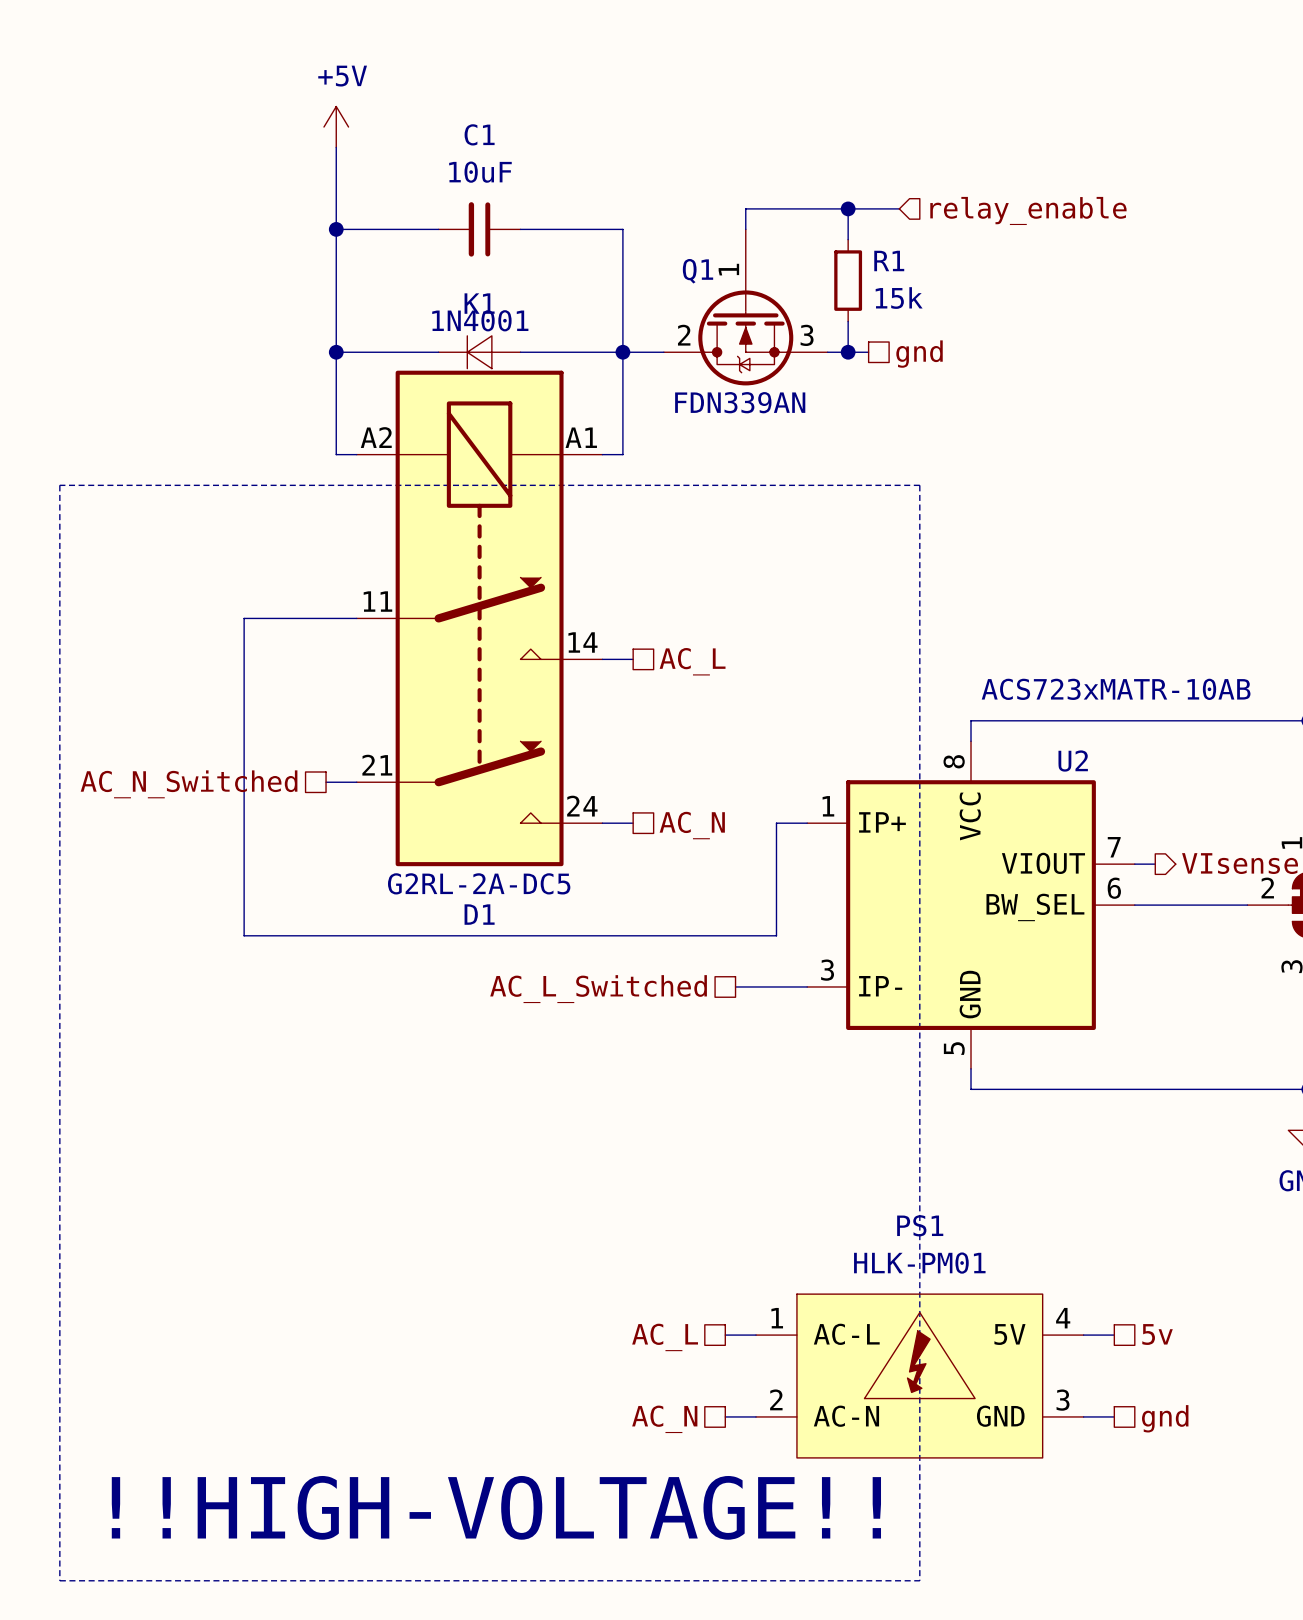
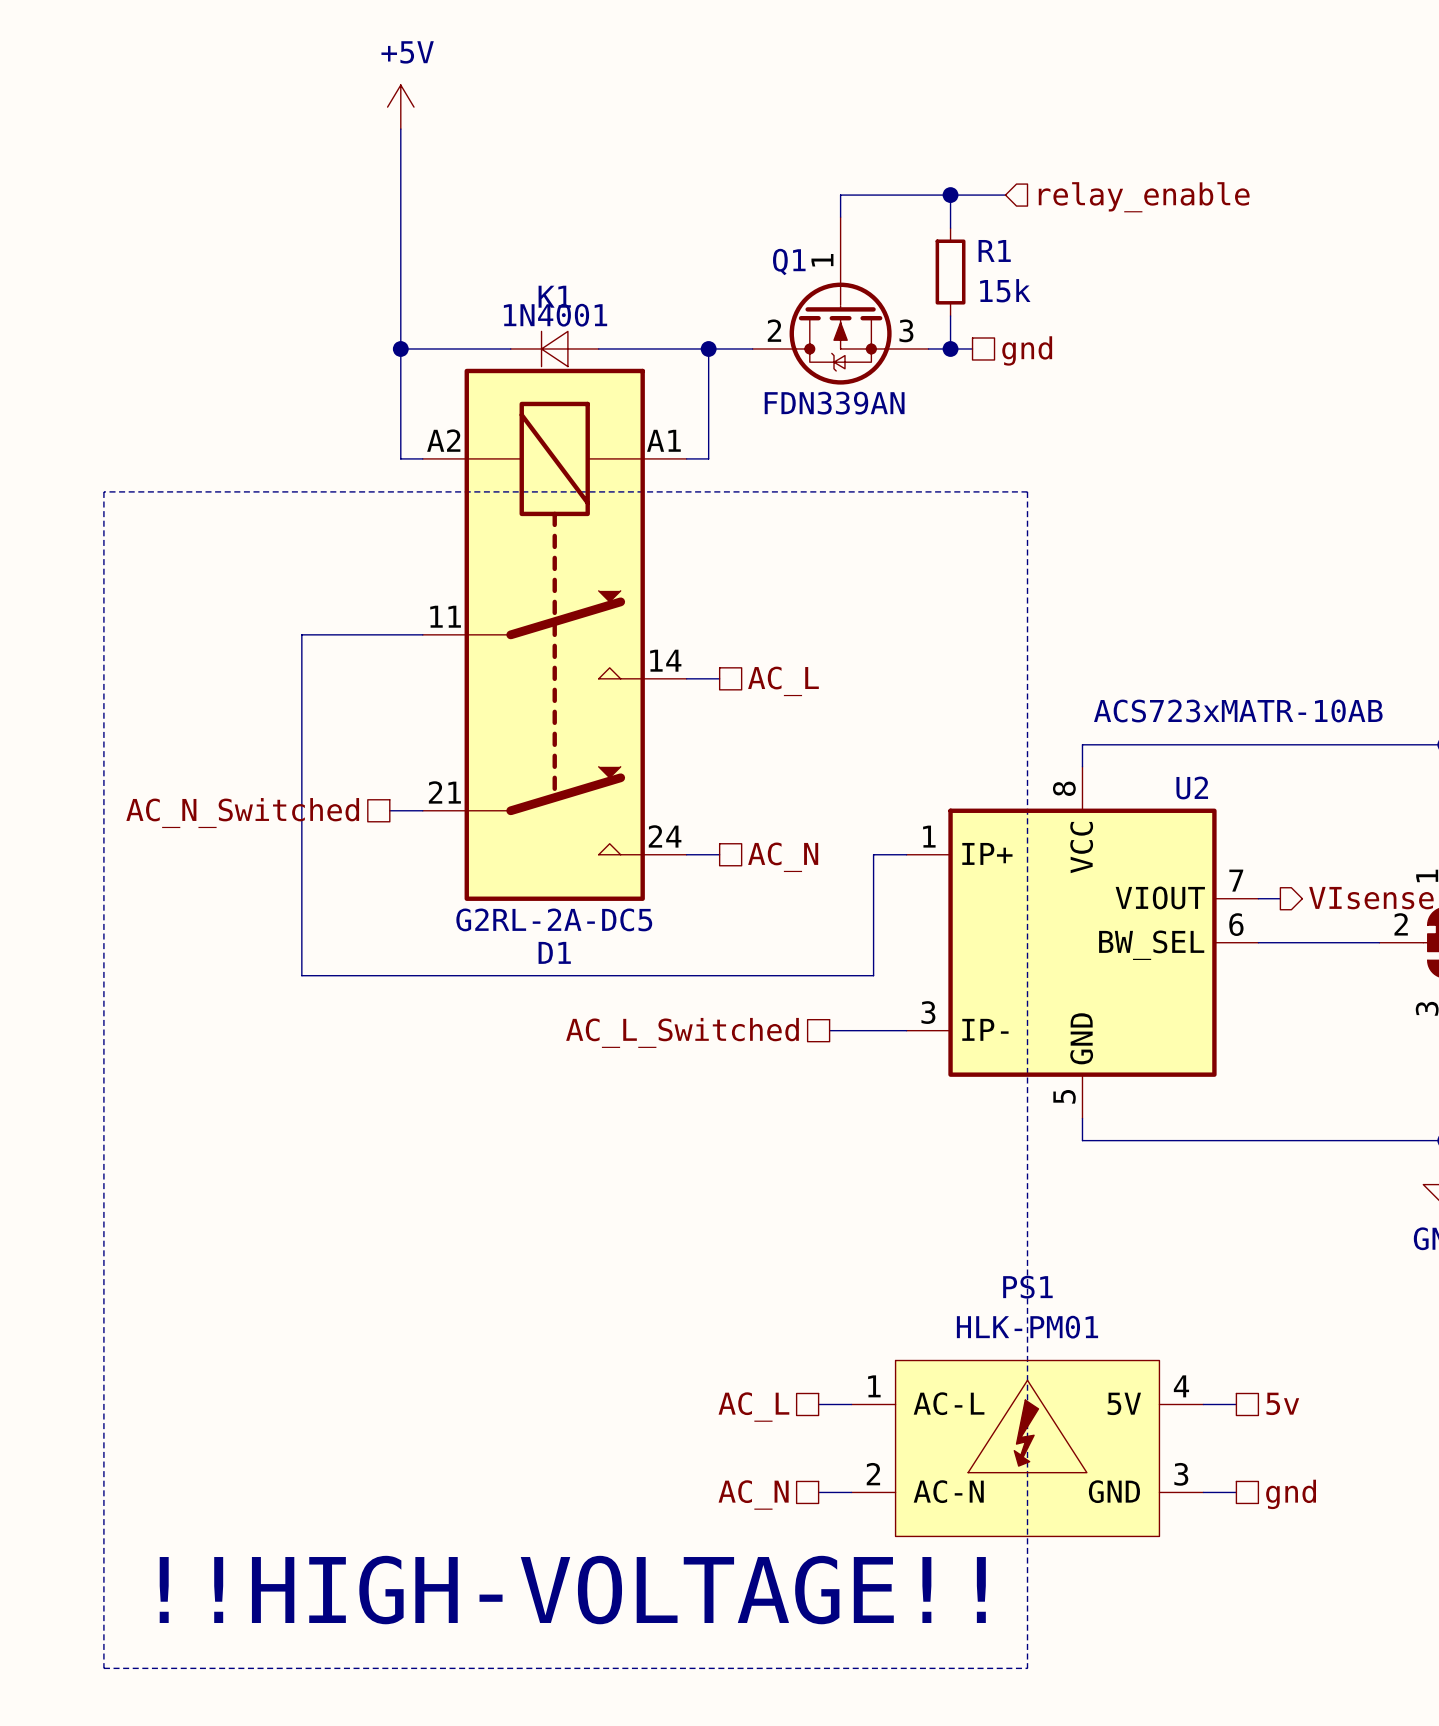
wire: (336, 229) (438, 229) -> none
junction: (336, 229) -> none
C1: 10uF (479, 229) -> none
wire: (520, 229) (622, 229) (622, 352) -> none

